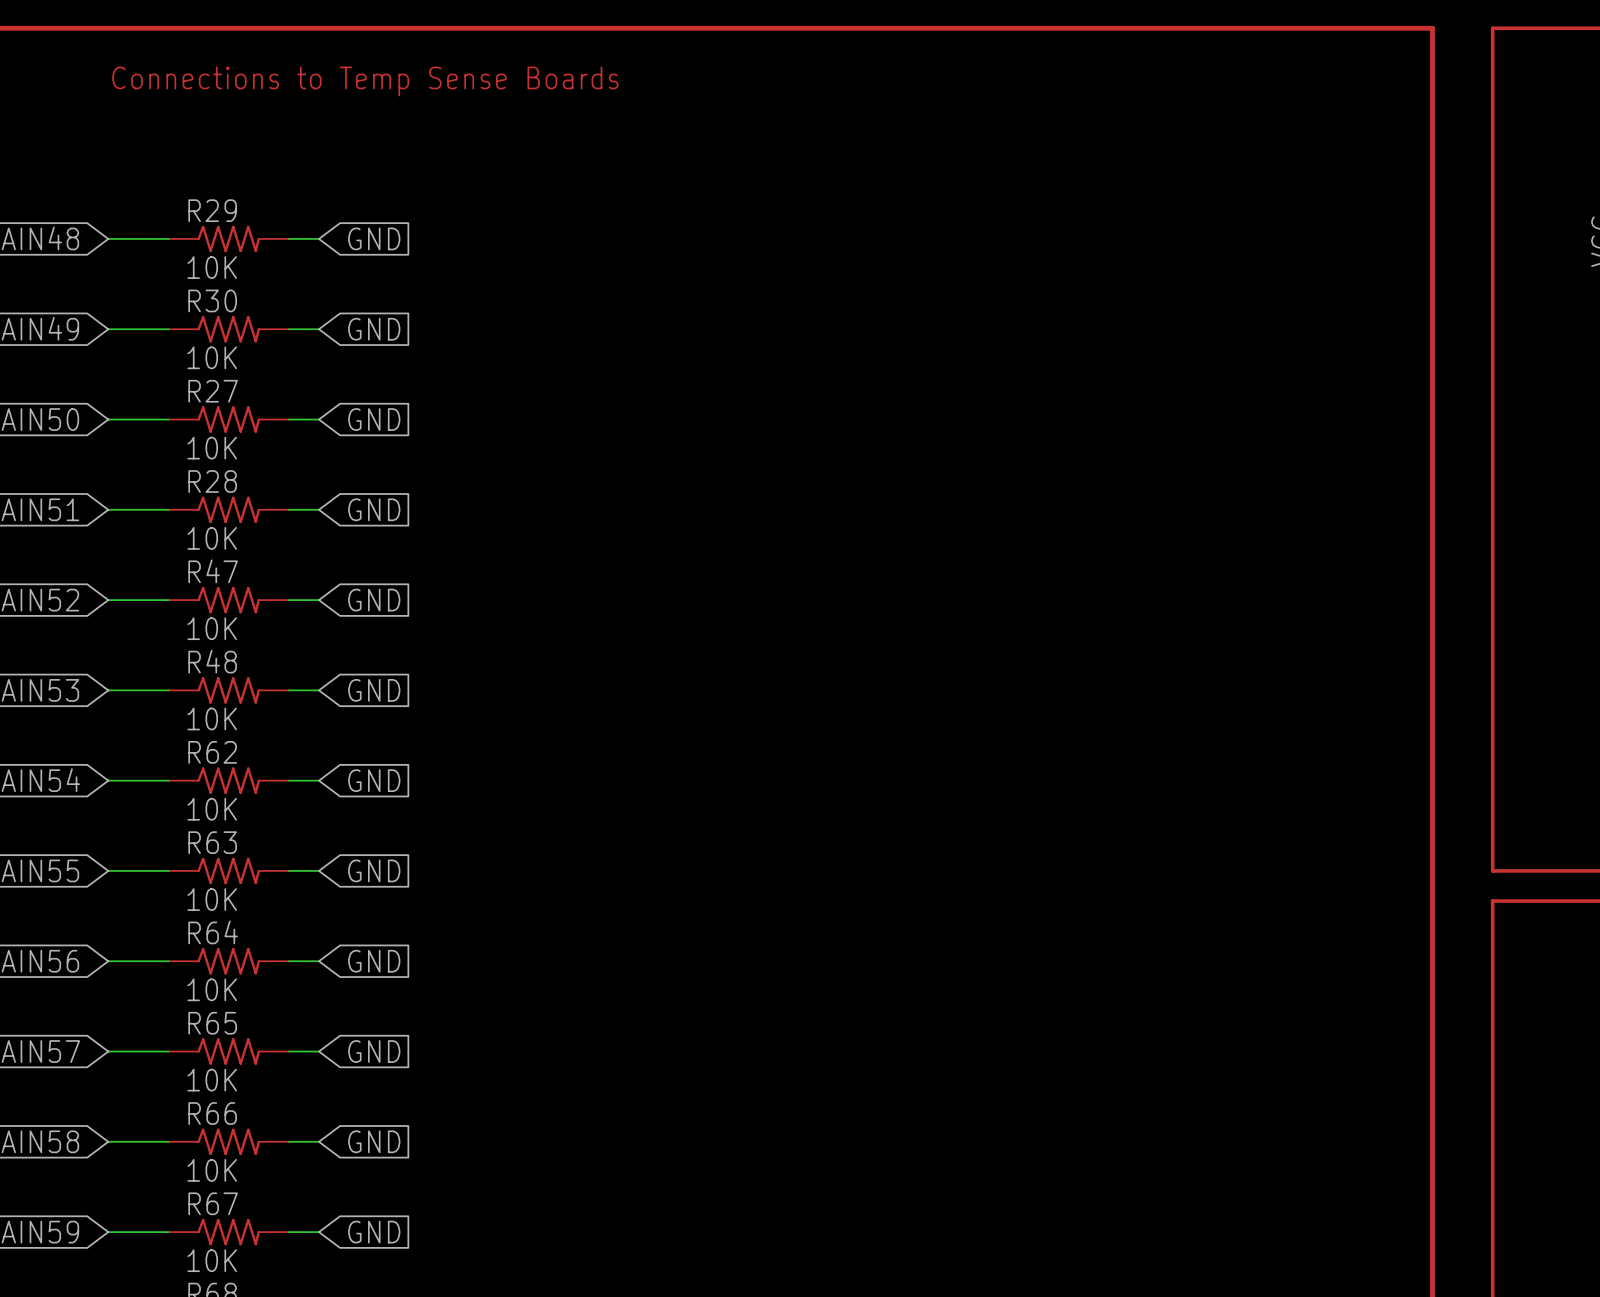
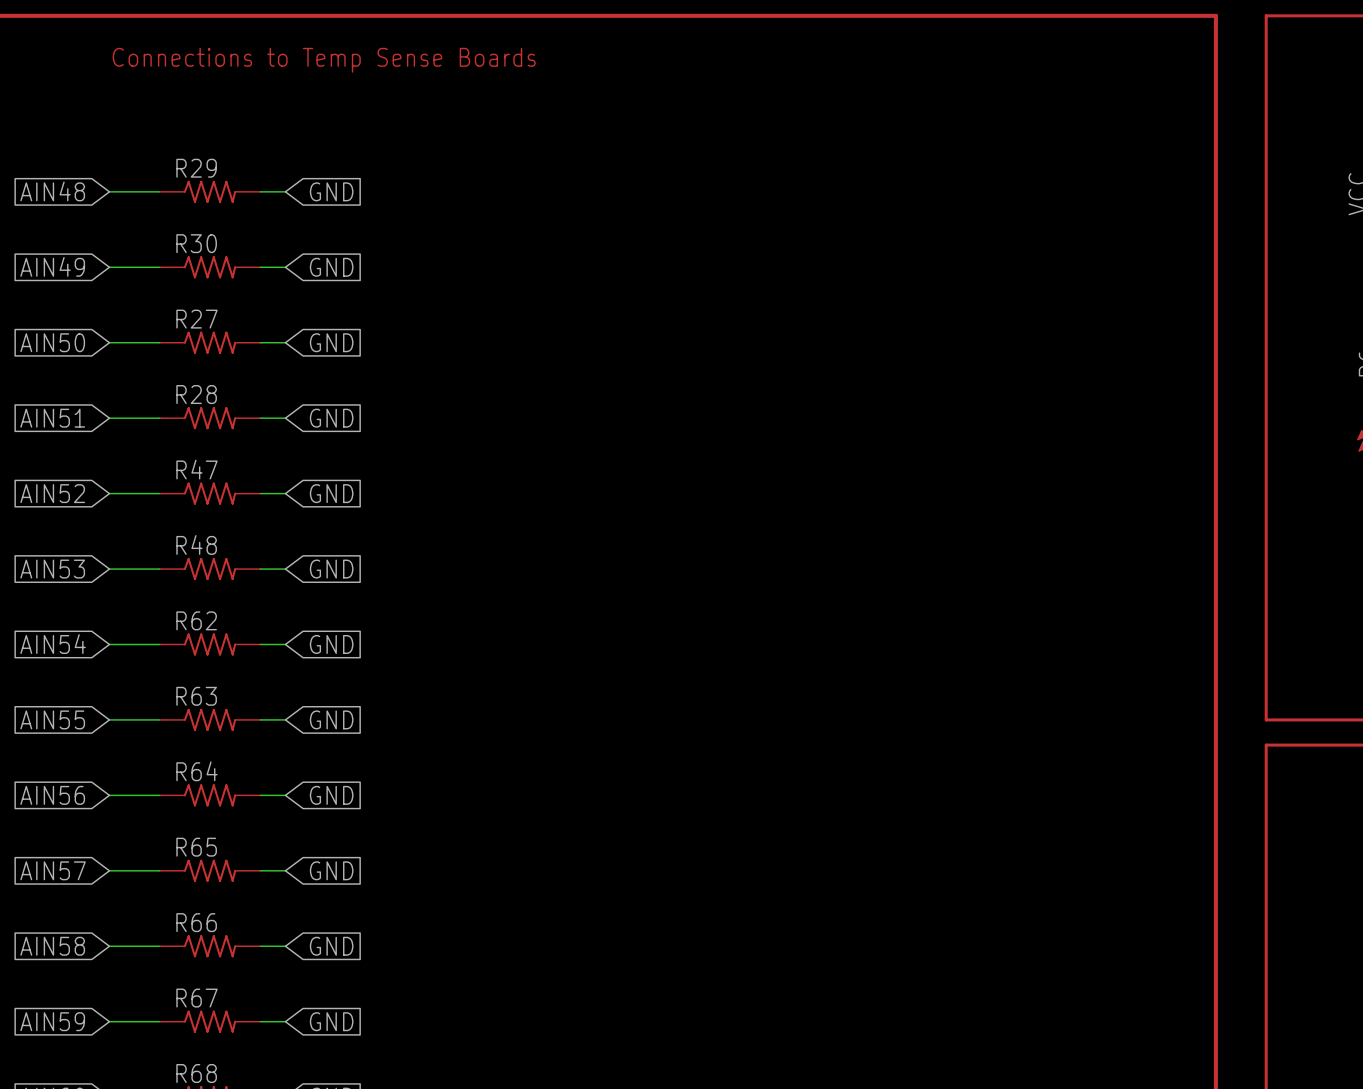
R29 value: 10K (212, 267) -> none
R30 value: 10K (212, 357) -> none
R27 value: 10K (212, 448) -> none
R28 value: 10K (212, 538) -> none
R47 value: 10K (212, 628) -> none
R48 value: 10K (212, 718) -> none
R62 value: 10K (212, 809) -> none
R63 value: 10K (212, 899) -> none
R64 value: 10K (212, 989) -> none
R65 value: 10K (212, 1080) -> none
R66 value: 10K (212, 1170) -> none
R67 value: 10K (212, 1260) -> none

